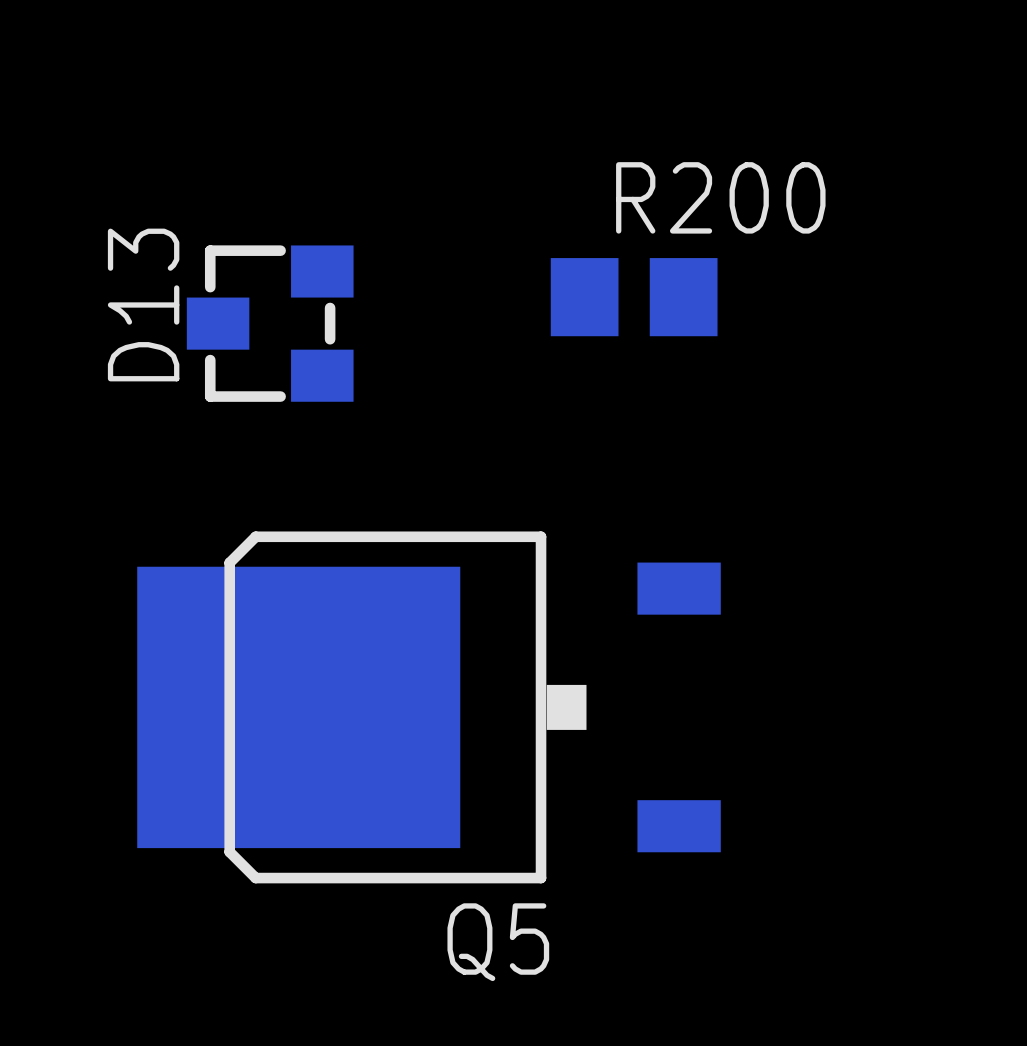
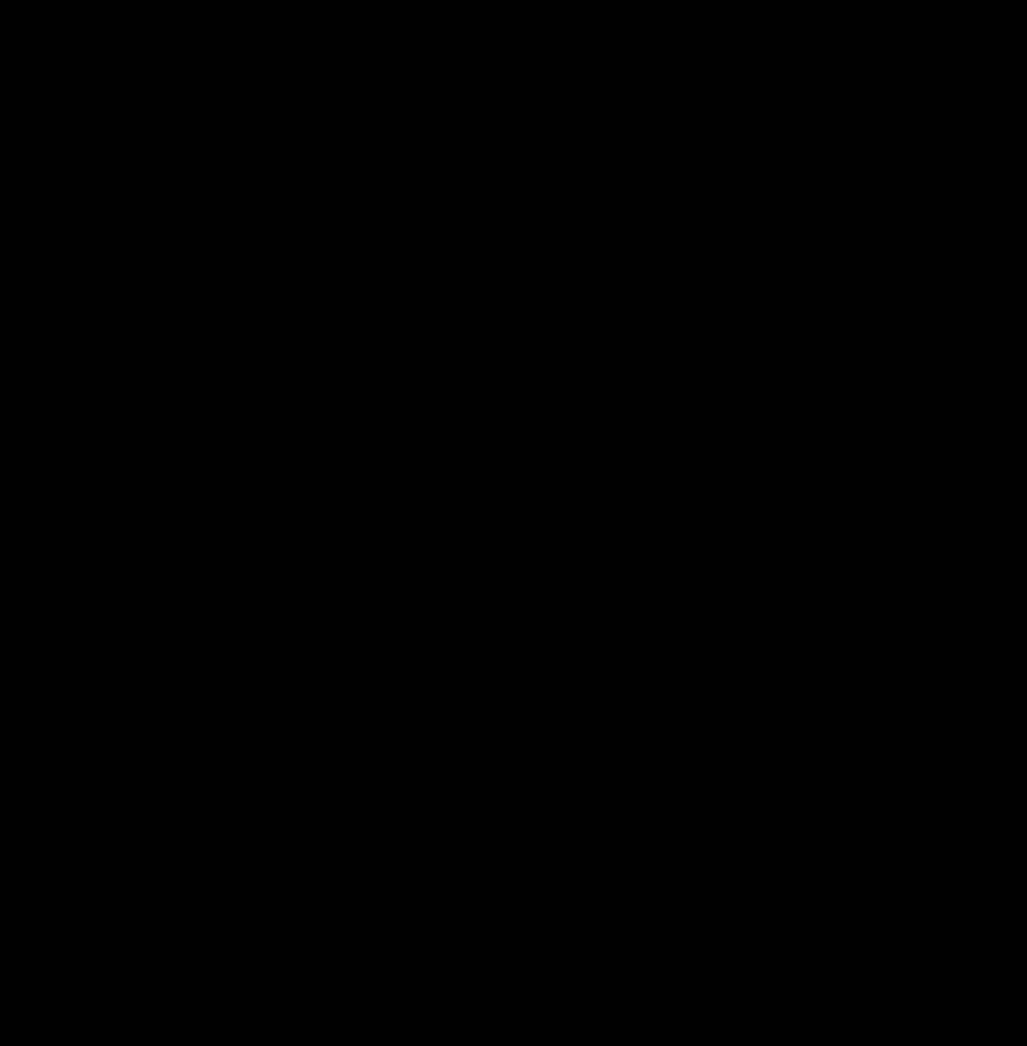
R200: (634, 297) -> none
D13: (270, 323) -> none
Q5: (429, 707) -> none

